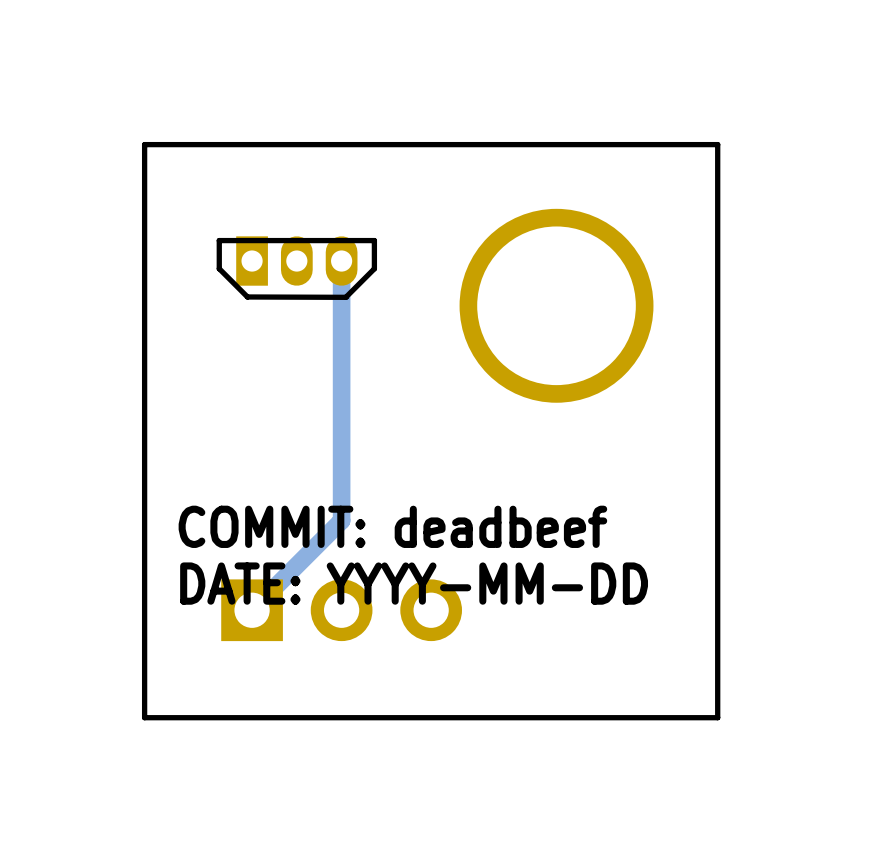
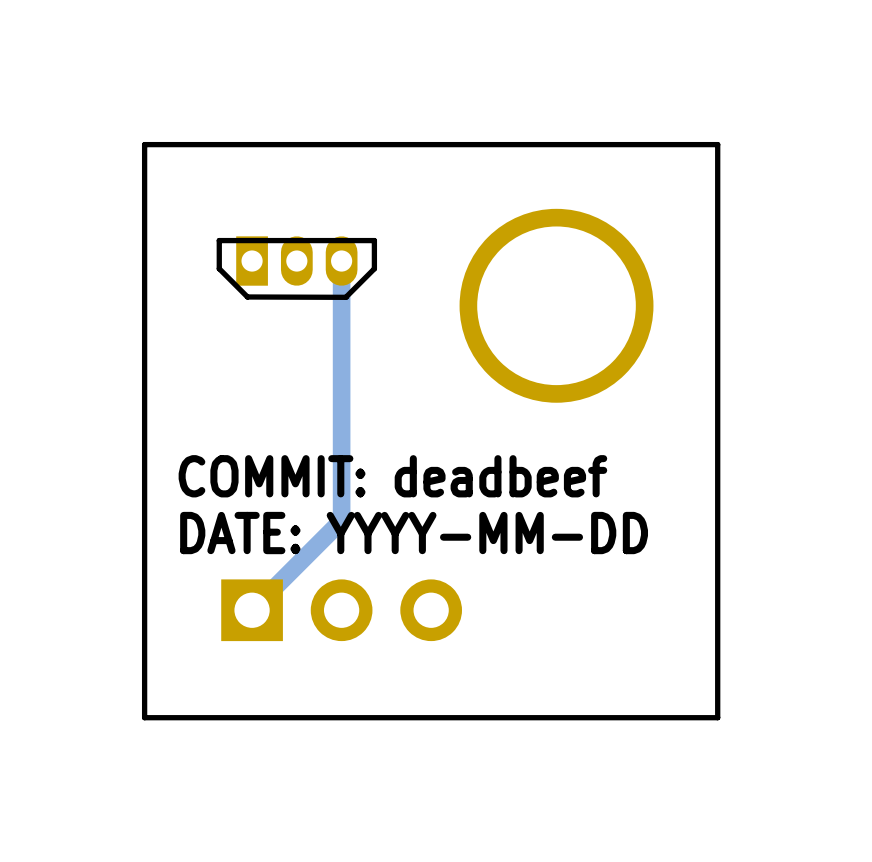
text position: COMMIT: deadbeef (392, 526) -> COMMIT: deadbeef (392, 476)
text position: DATE: YYYY-MM-DD (414, 583) -> DATE: YYYY-MM-DD (414, 533)

